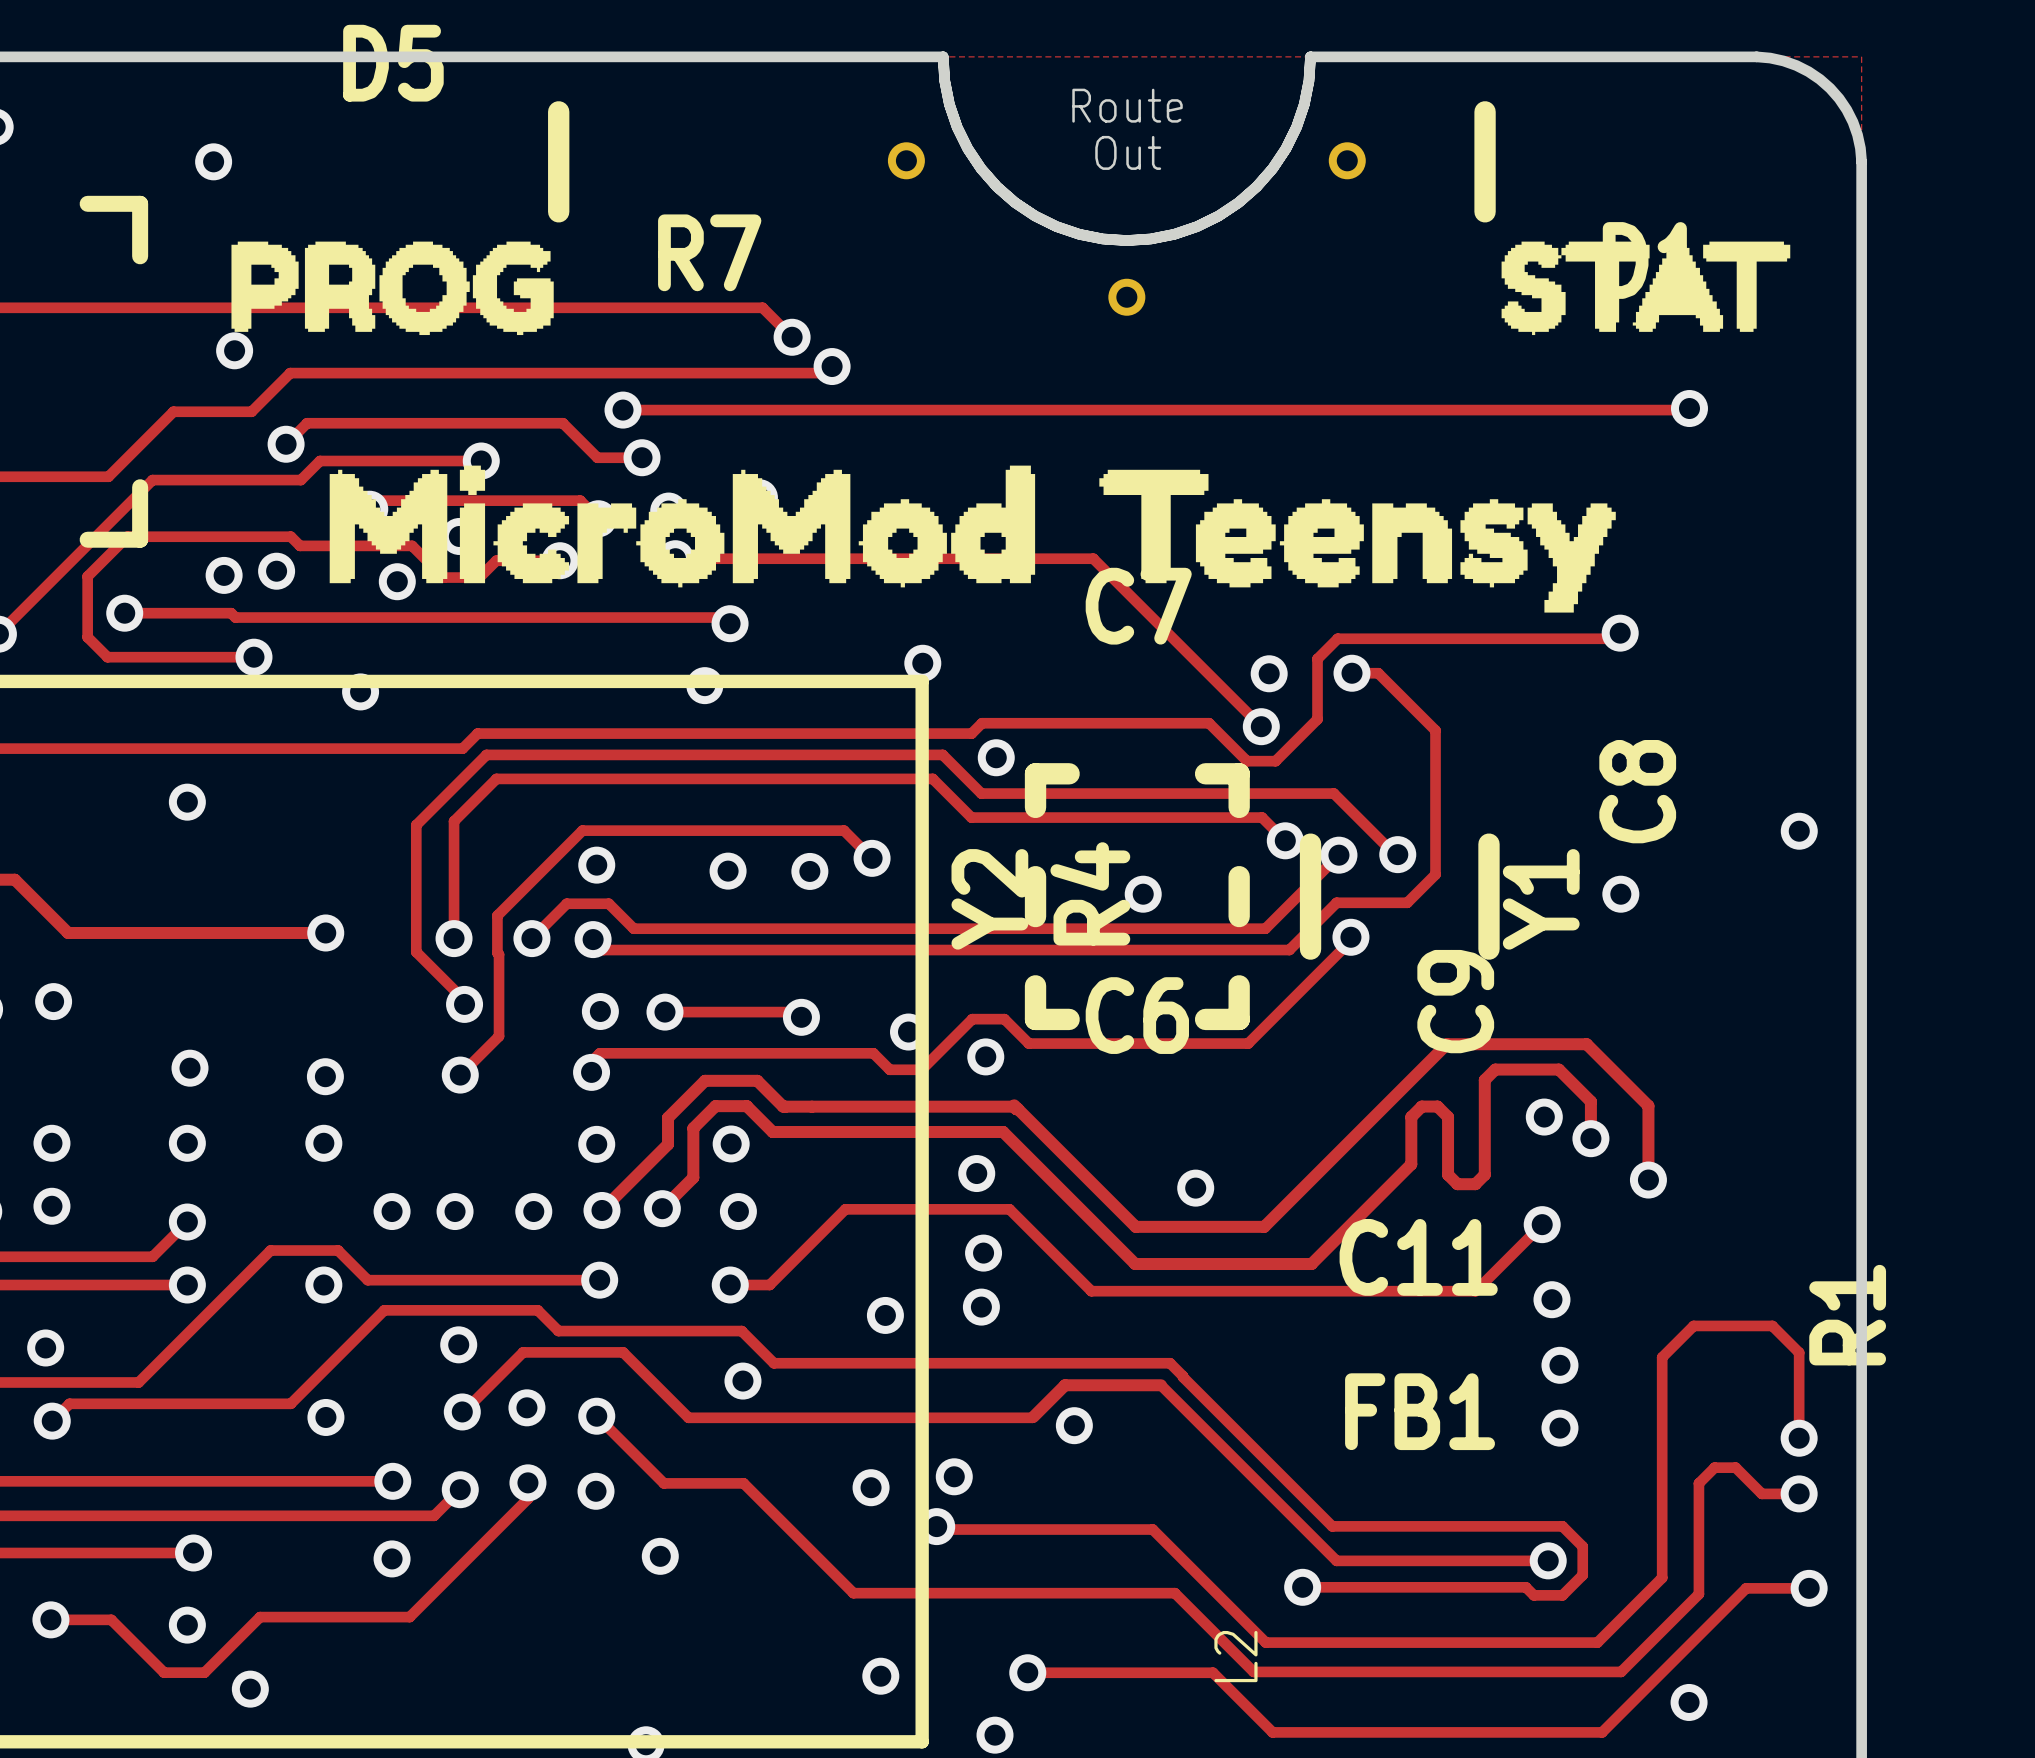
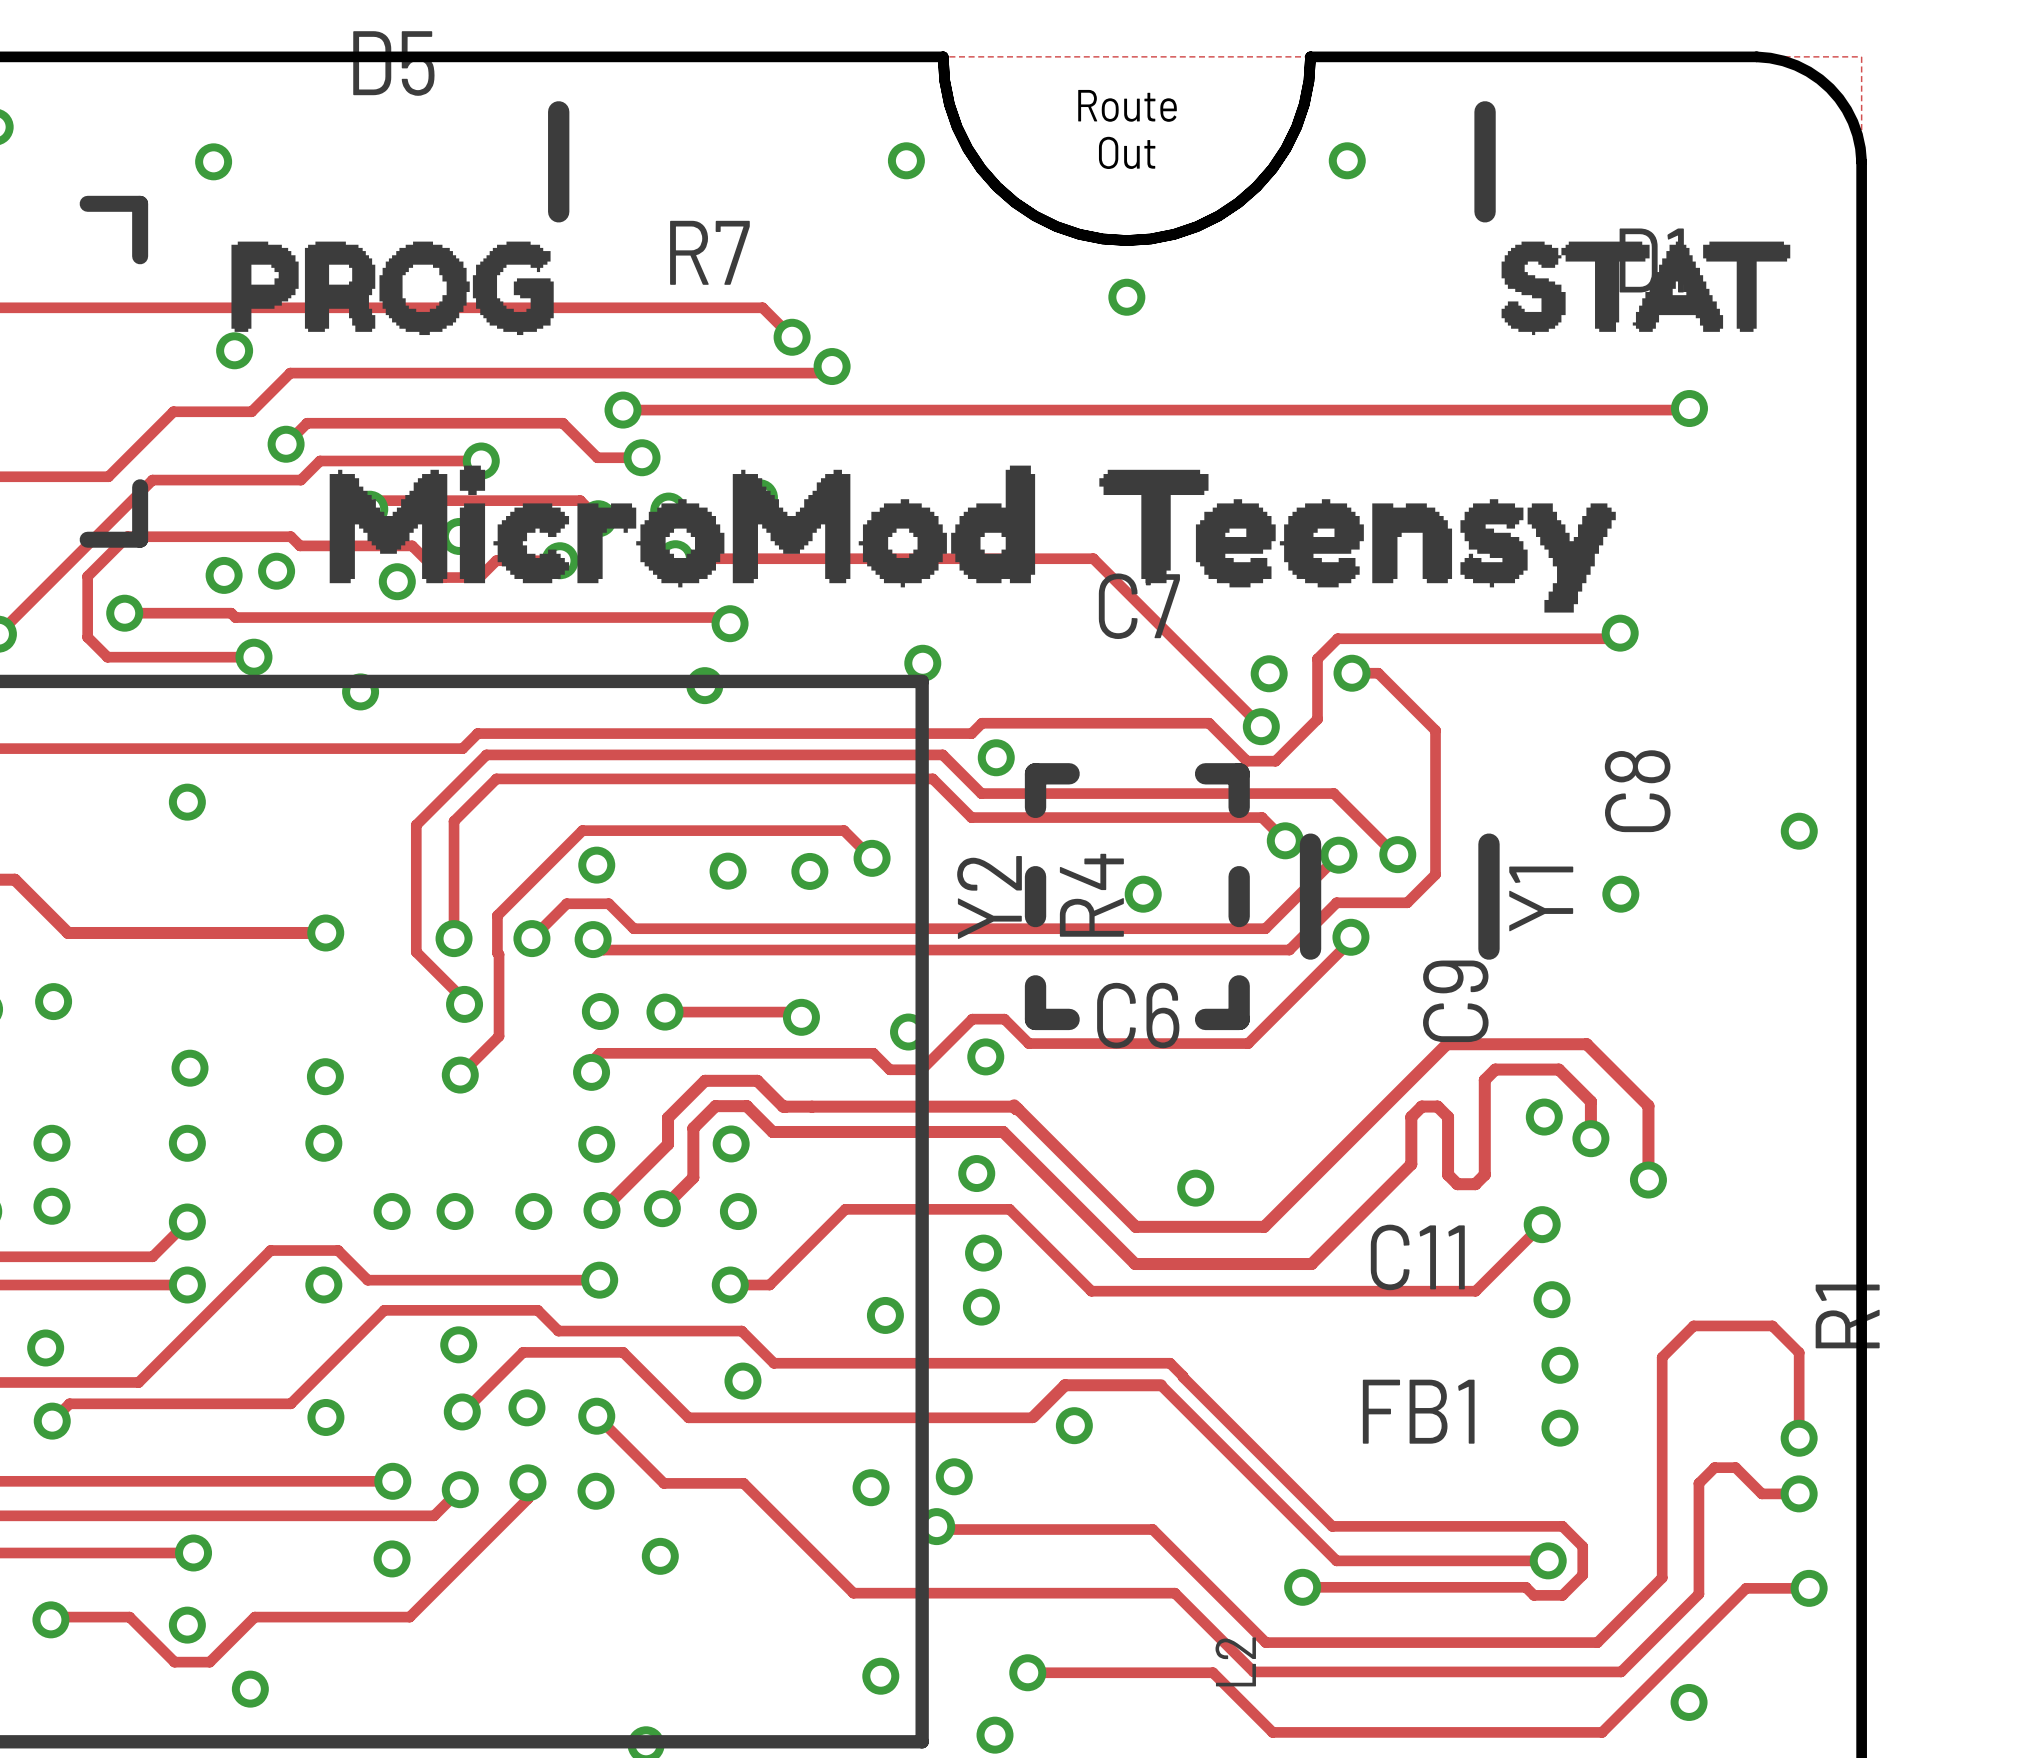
track: (260, 1617) (204, 1672) (164, 1672) (111, 1619) (50, 1619) -> (260, 1617) (254, 1617) (209, 1662) (174, 1662) (129, 1617) (48, 1617)

